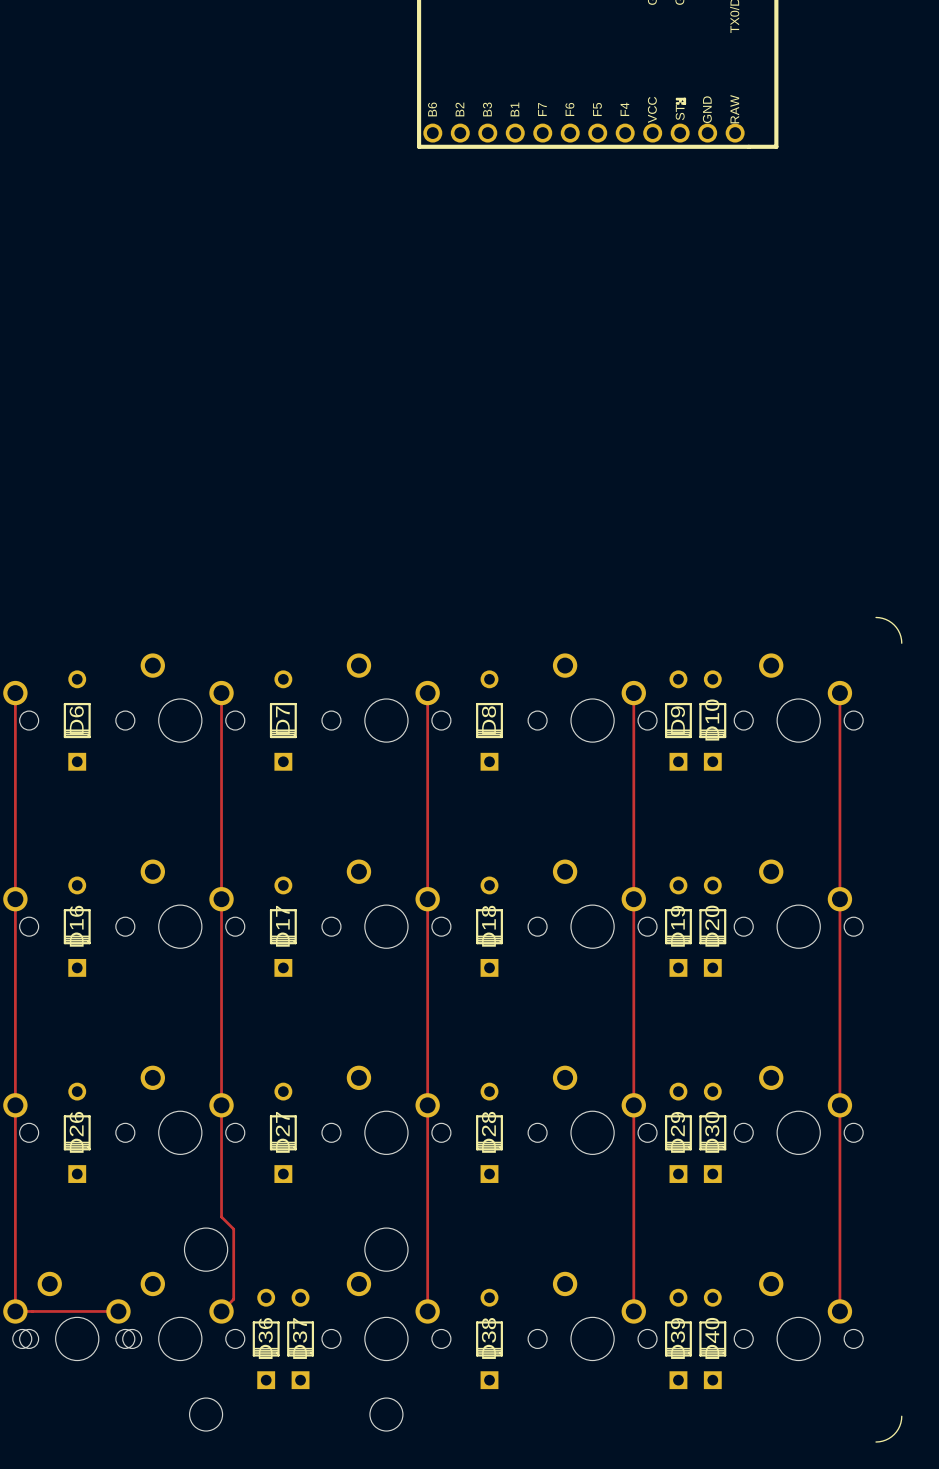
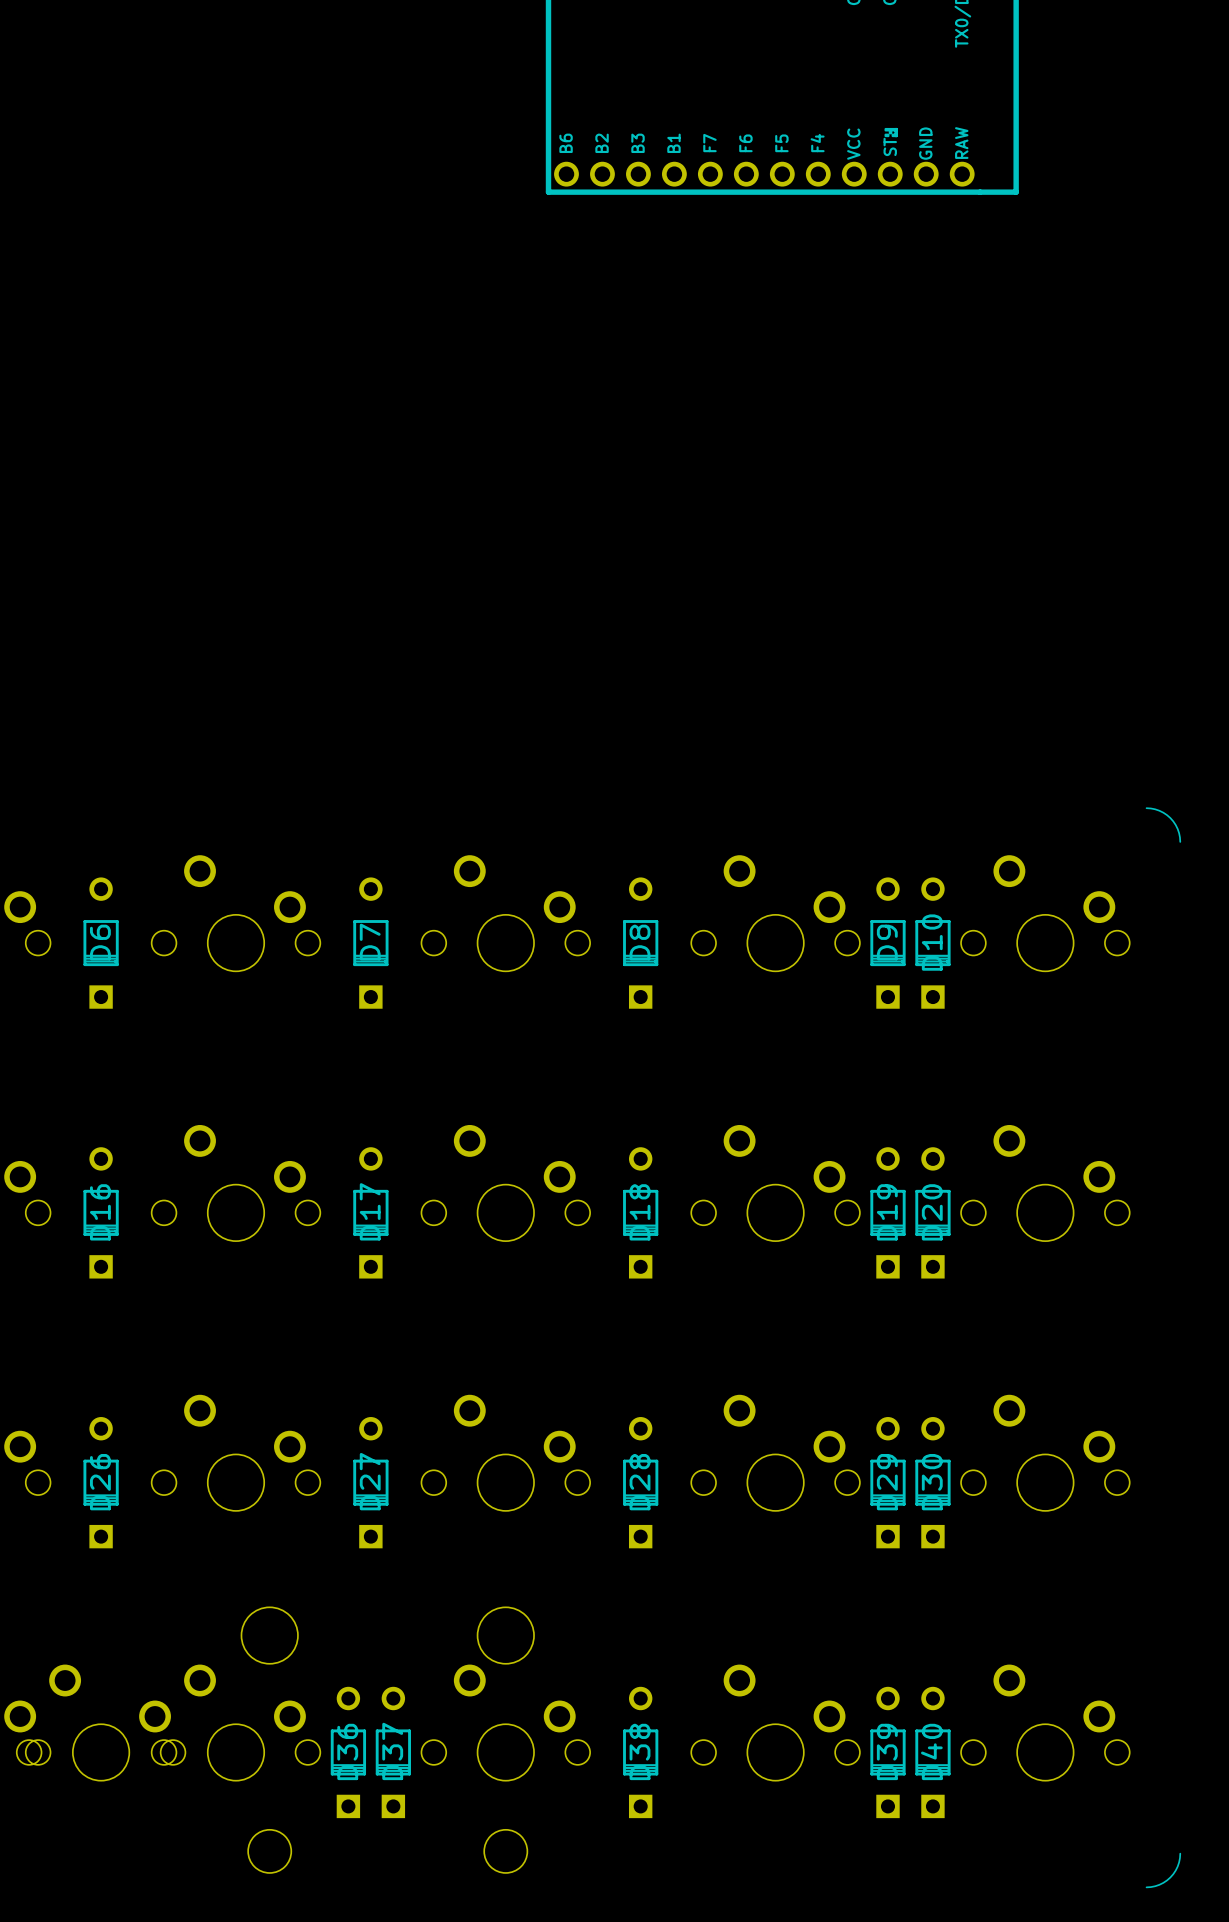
top track: (15, 693) (15, 1311) (118, 1311) -> none
top track: (221, 693) (221, 1216) (233, 1229) (233, 1299) (221, 1311) -> none
top track: (427, 693) (427, 1311) -> none
top track: (633, 693) (633, 1311) -> none
top track: (839, 693) (839, 1311) -> none

